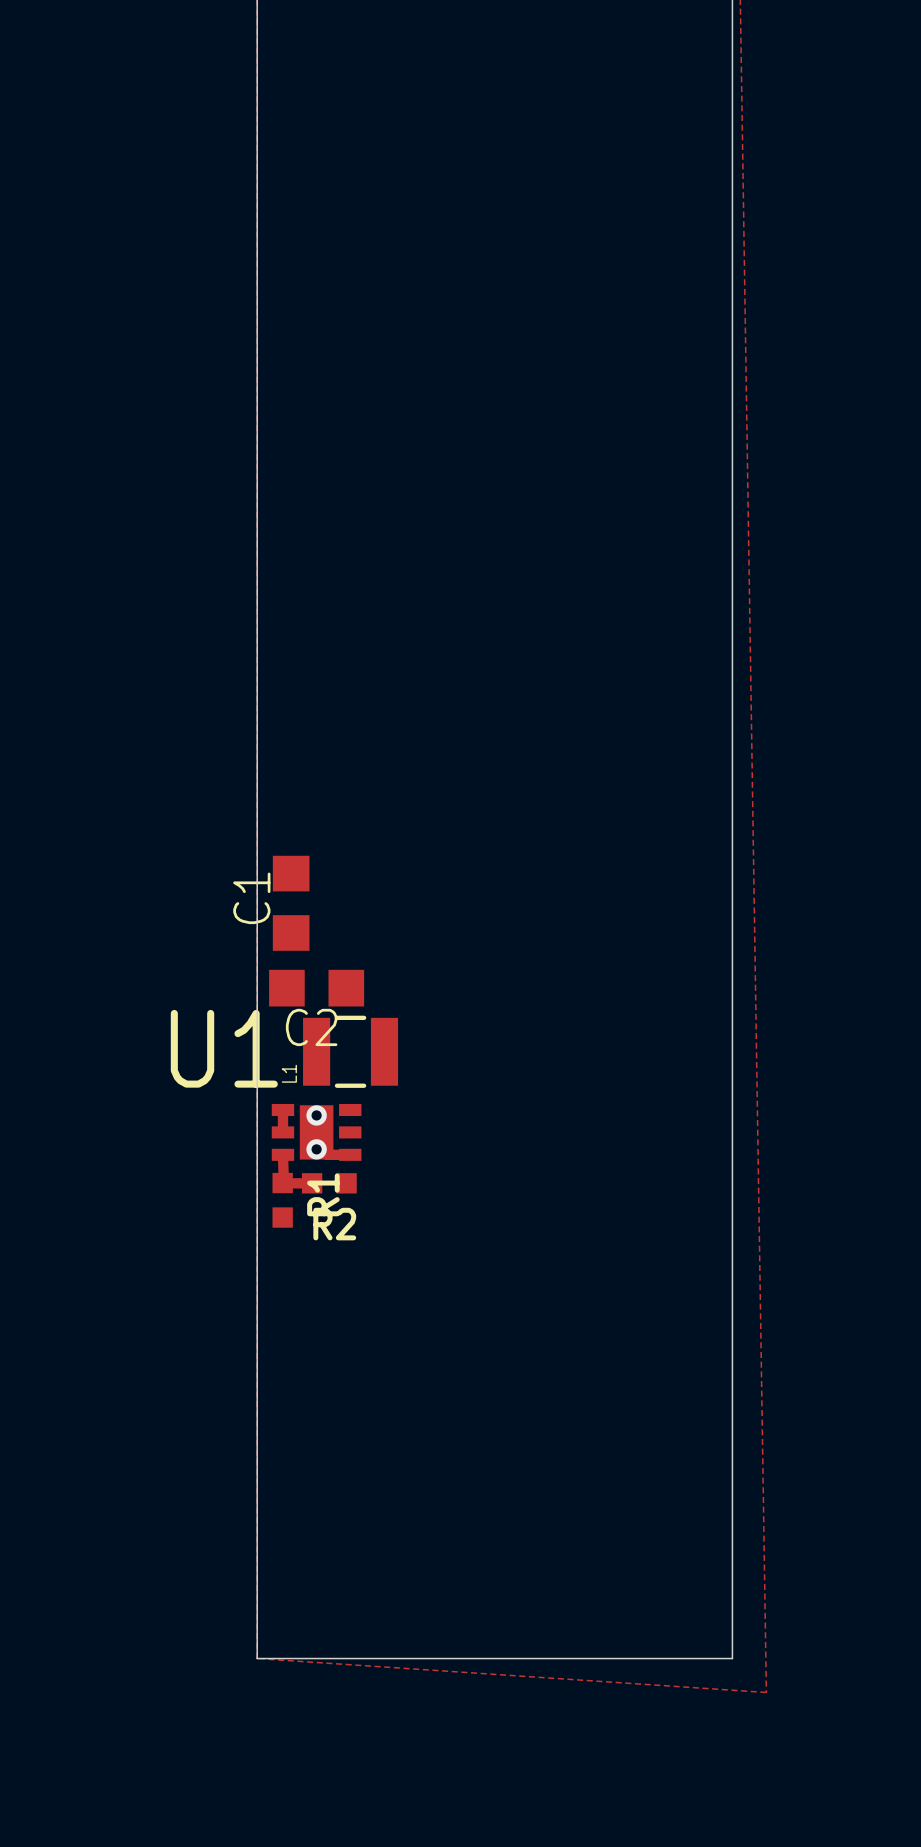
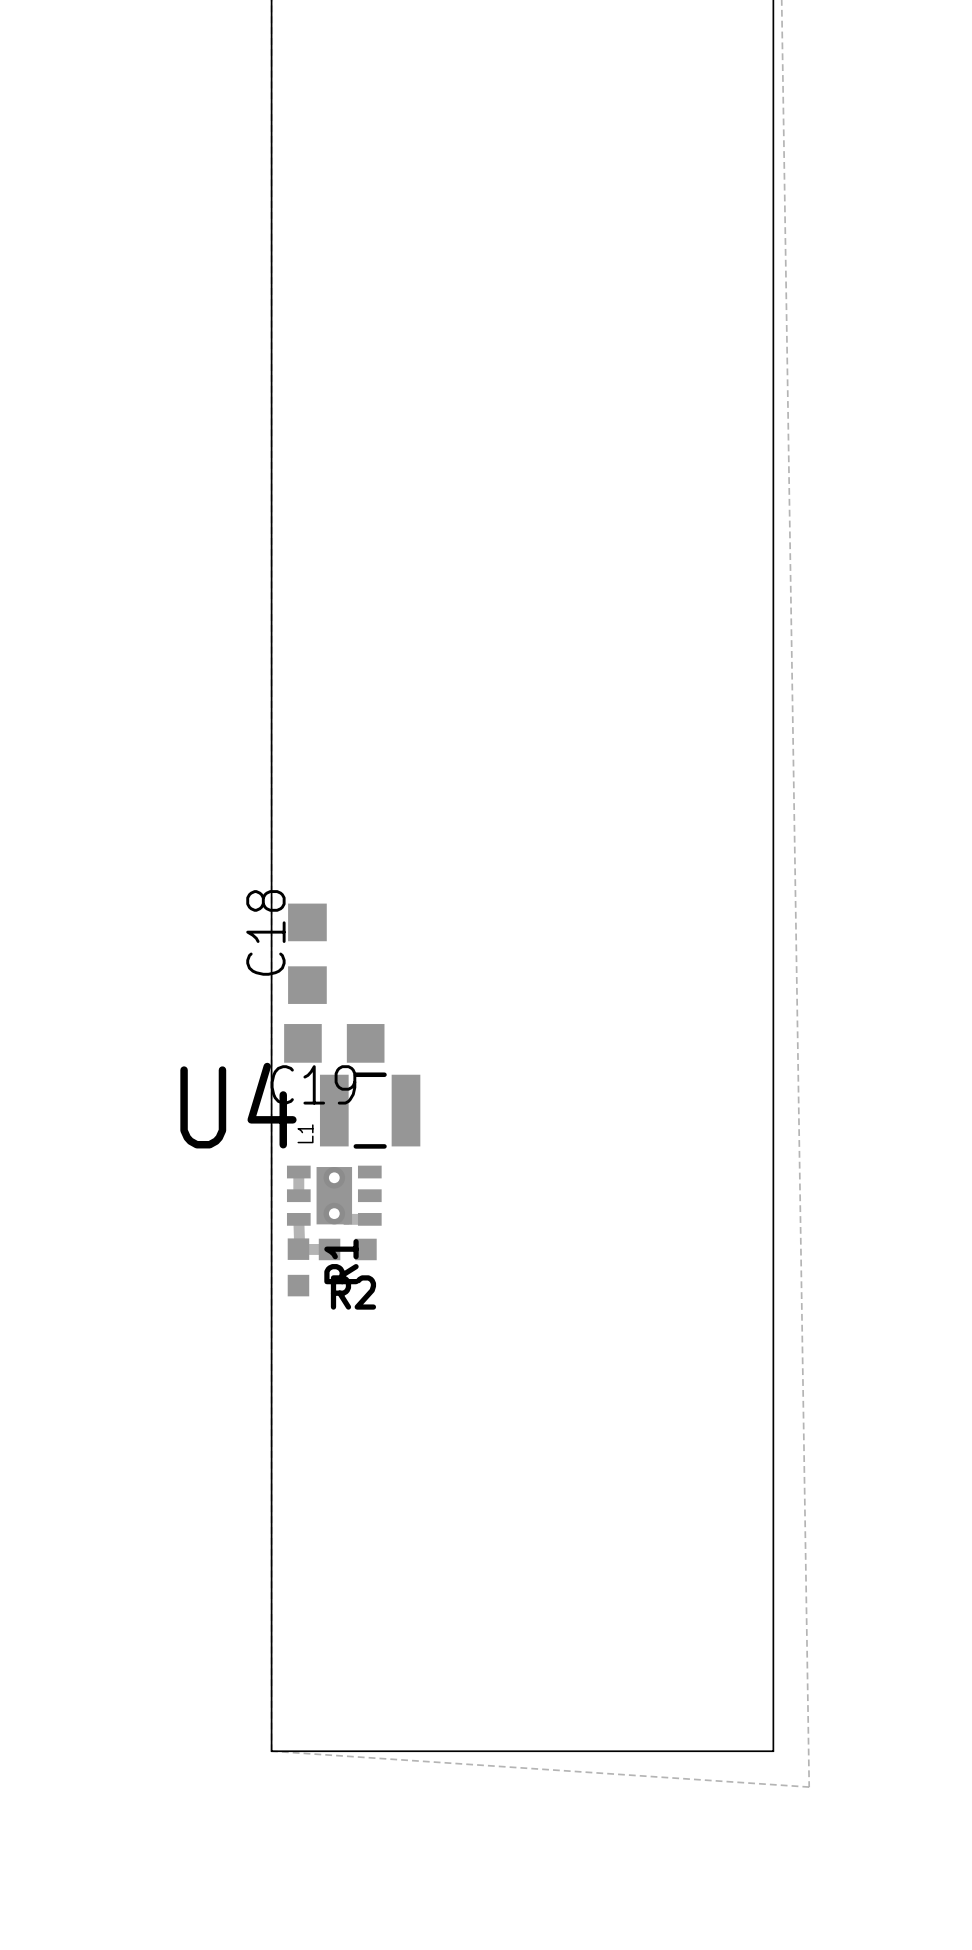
C1 name: C1 (251, 898) -> C18 (265, 932)
C2 name: C2 (311, 1027) -> C19 (313, 1084)
U1 name: U1 (224, 1048) -> U4 (238, 1105)

